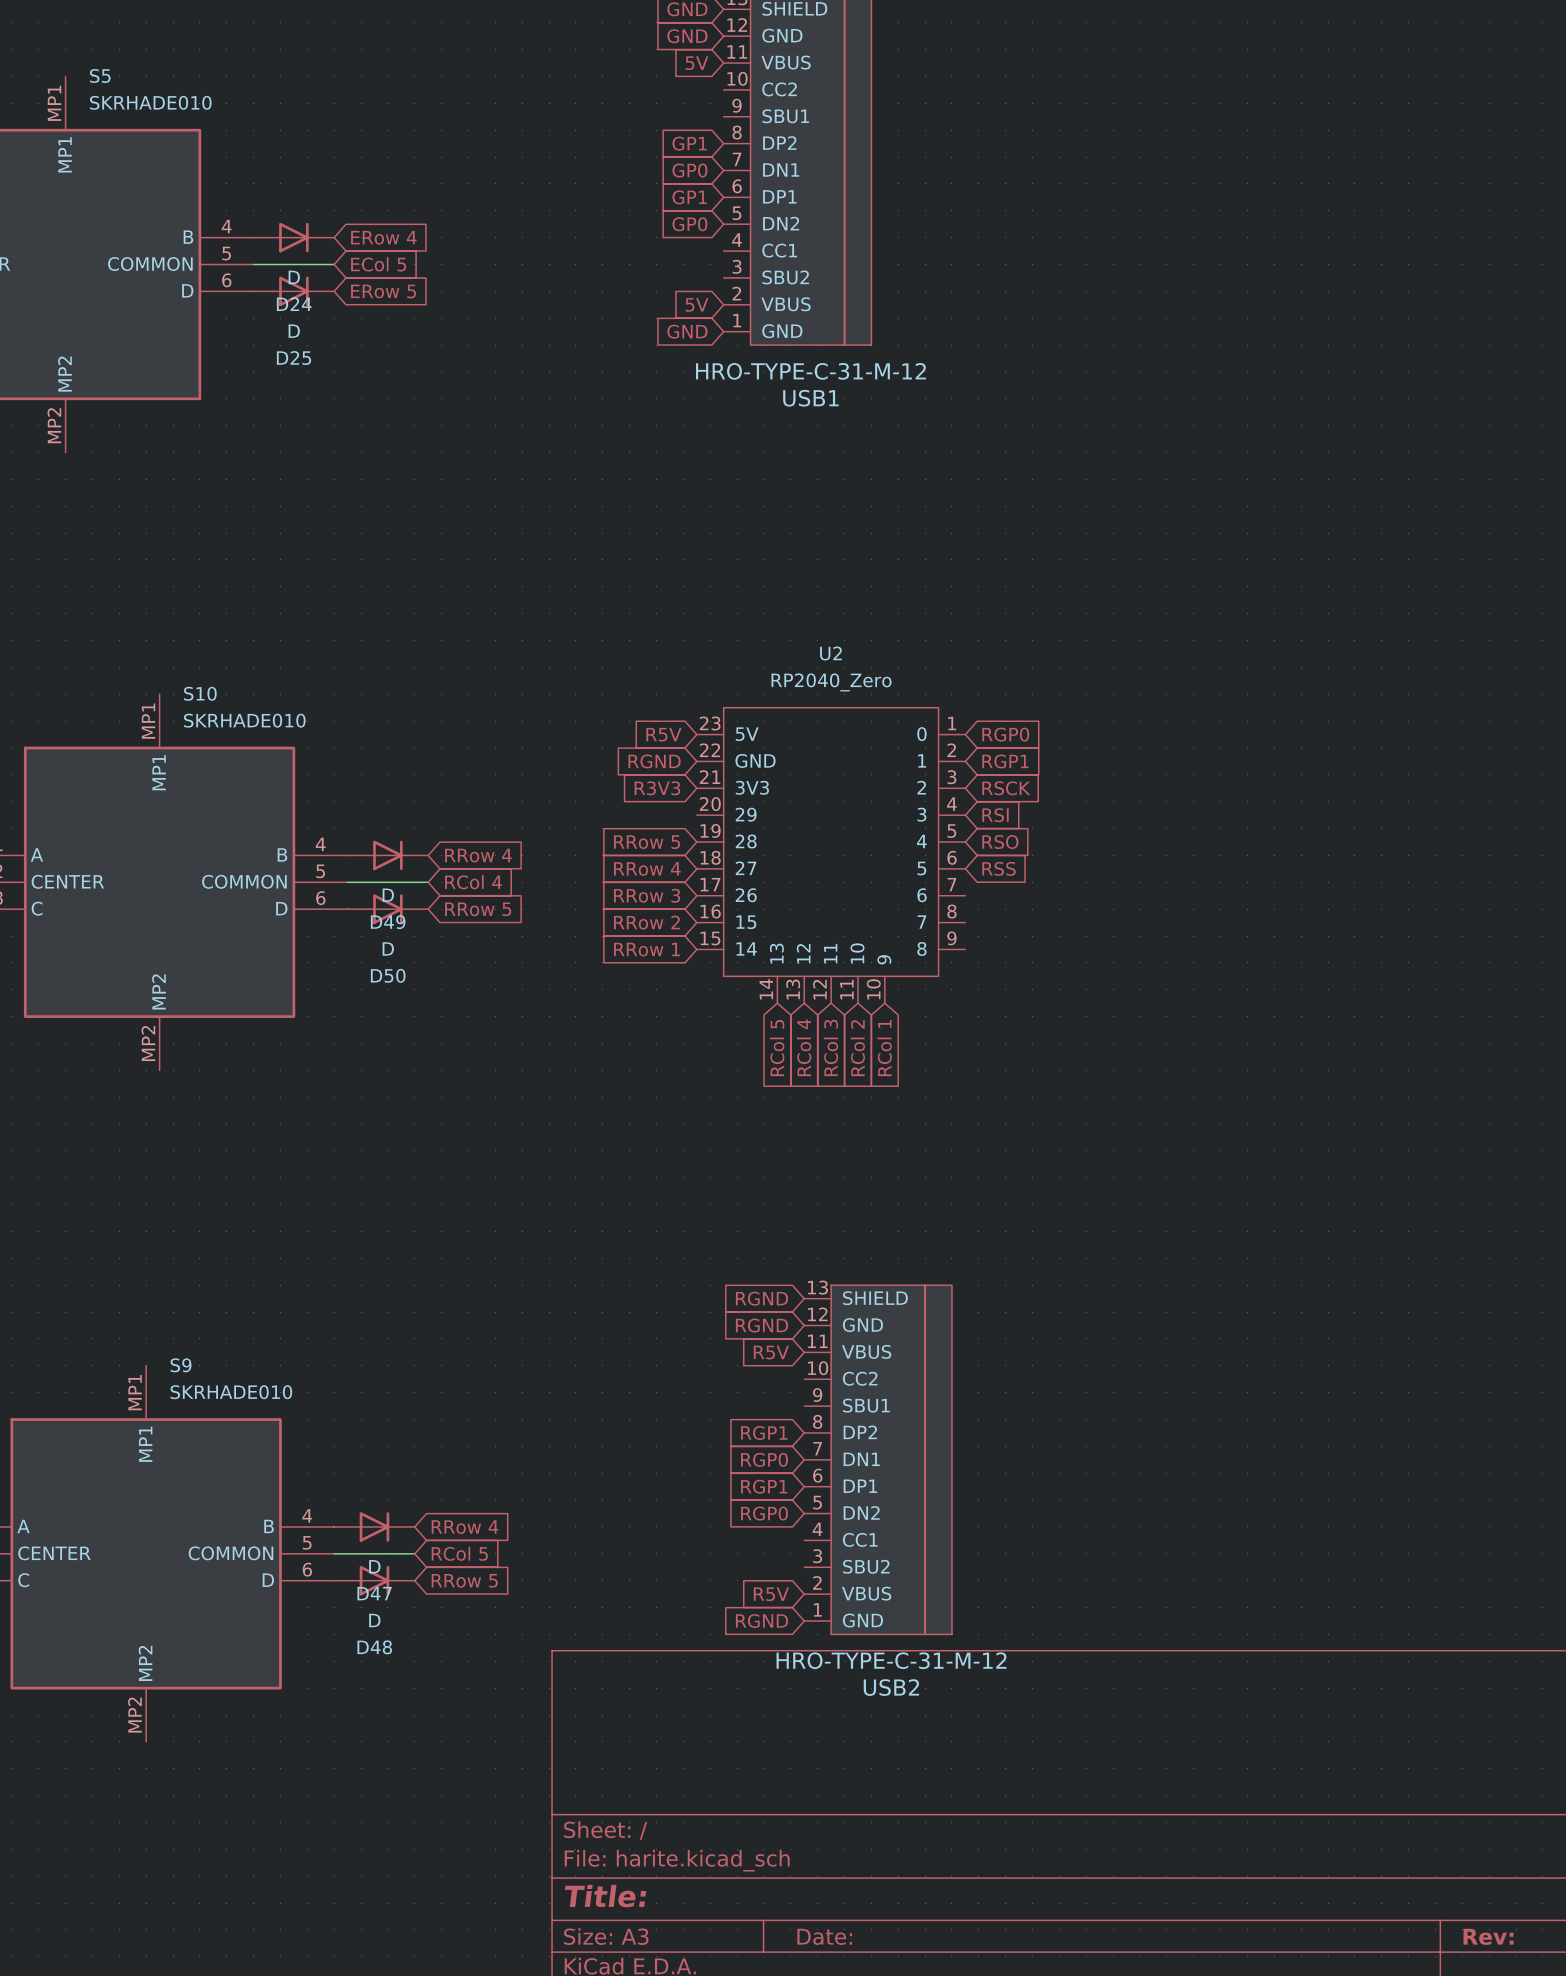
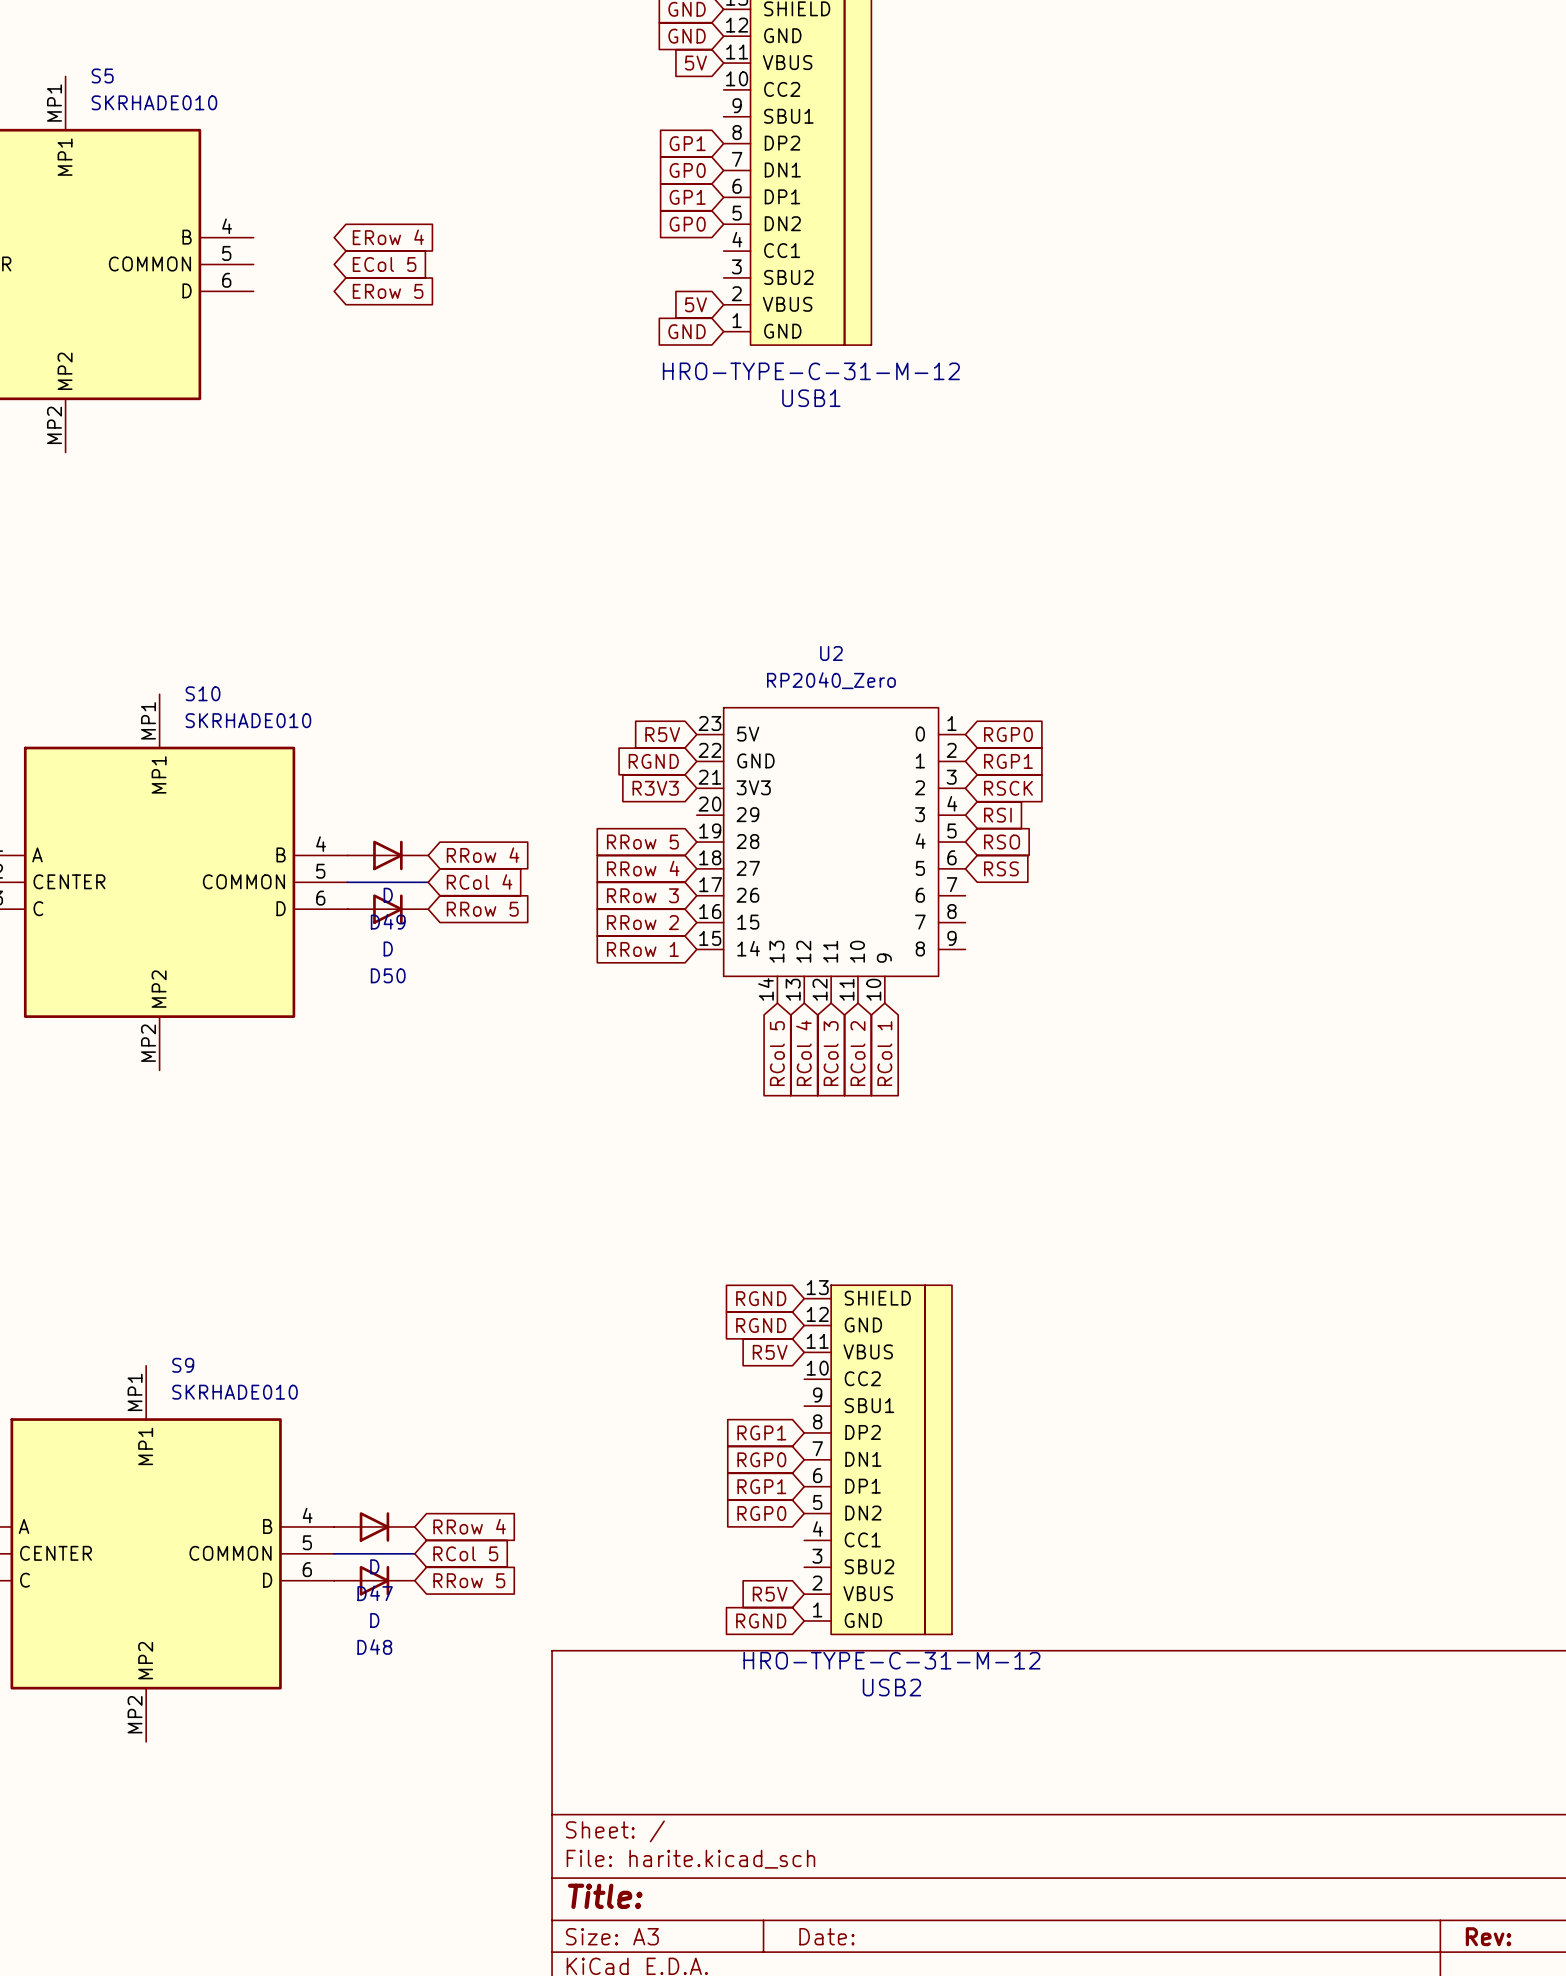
D24: D (293, 237) -> none
wire: (253, 264) (334, 264) -> none
D25: D (293, 291) -> none

